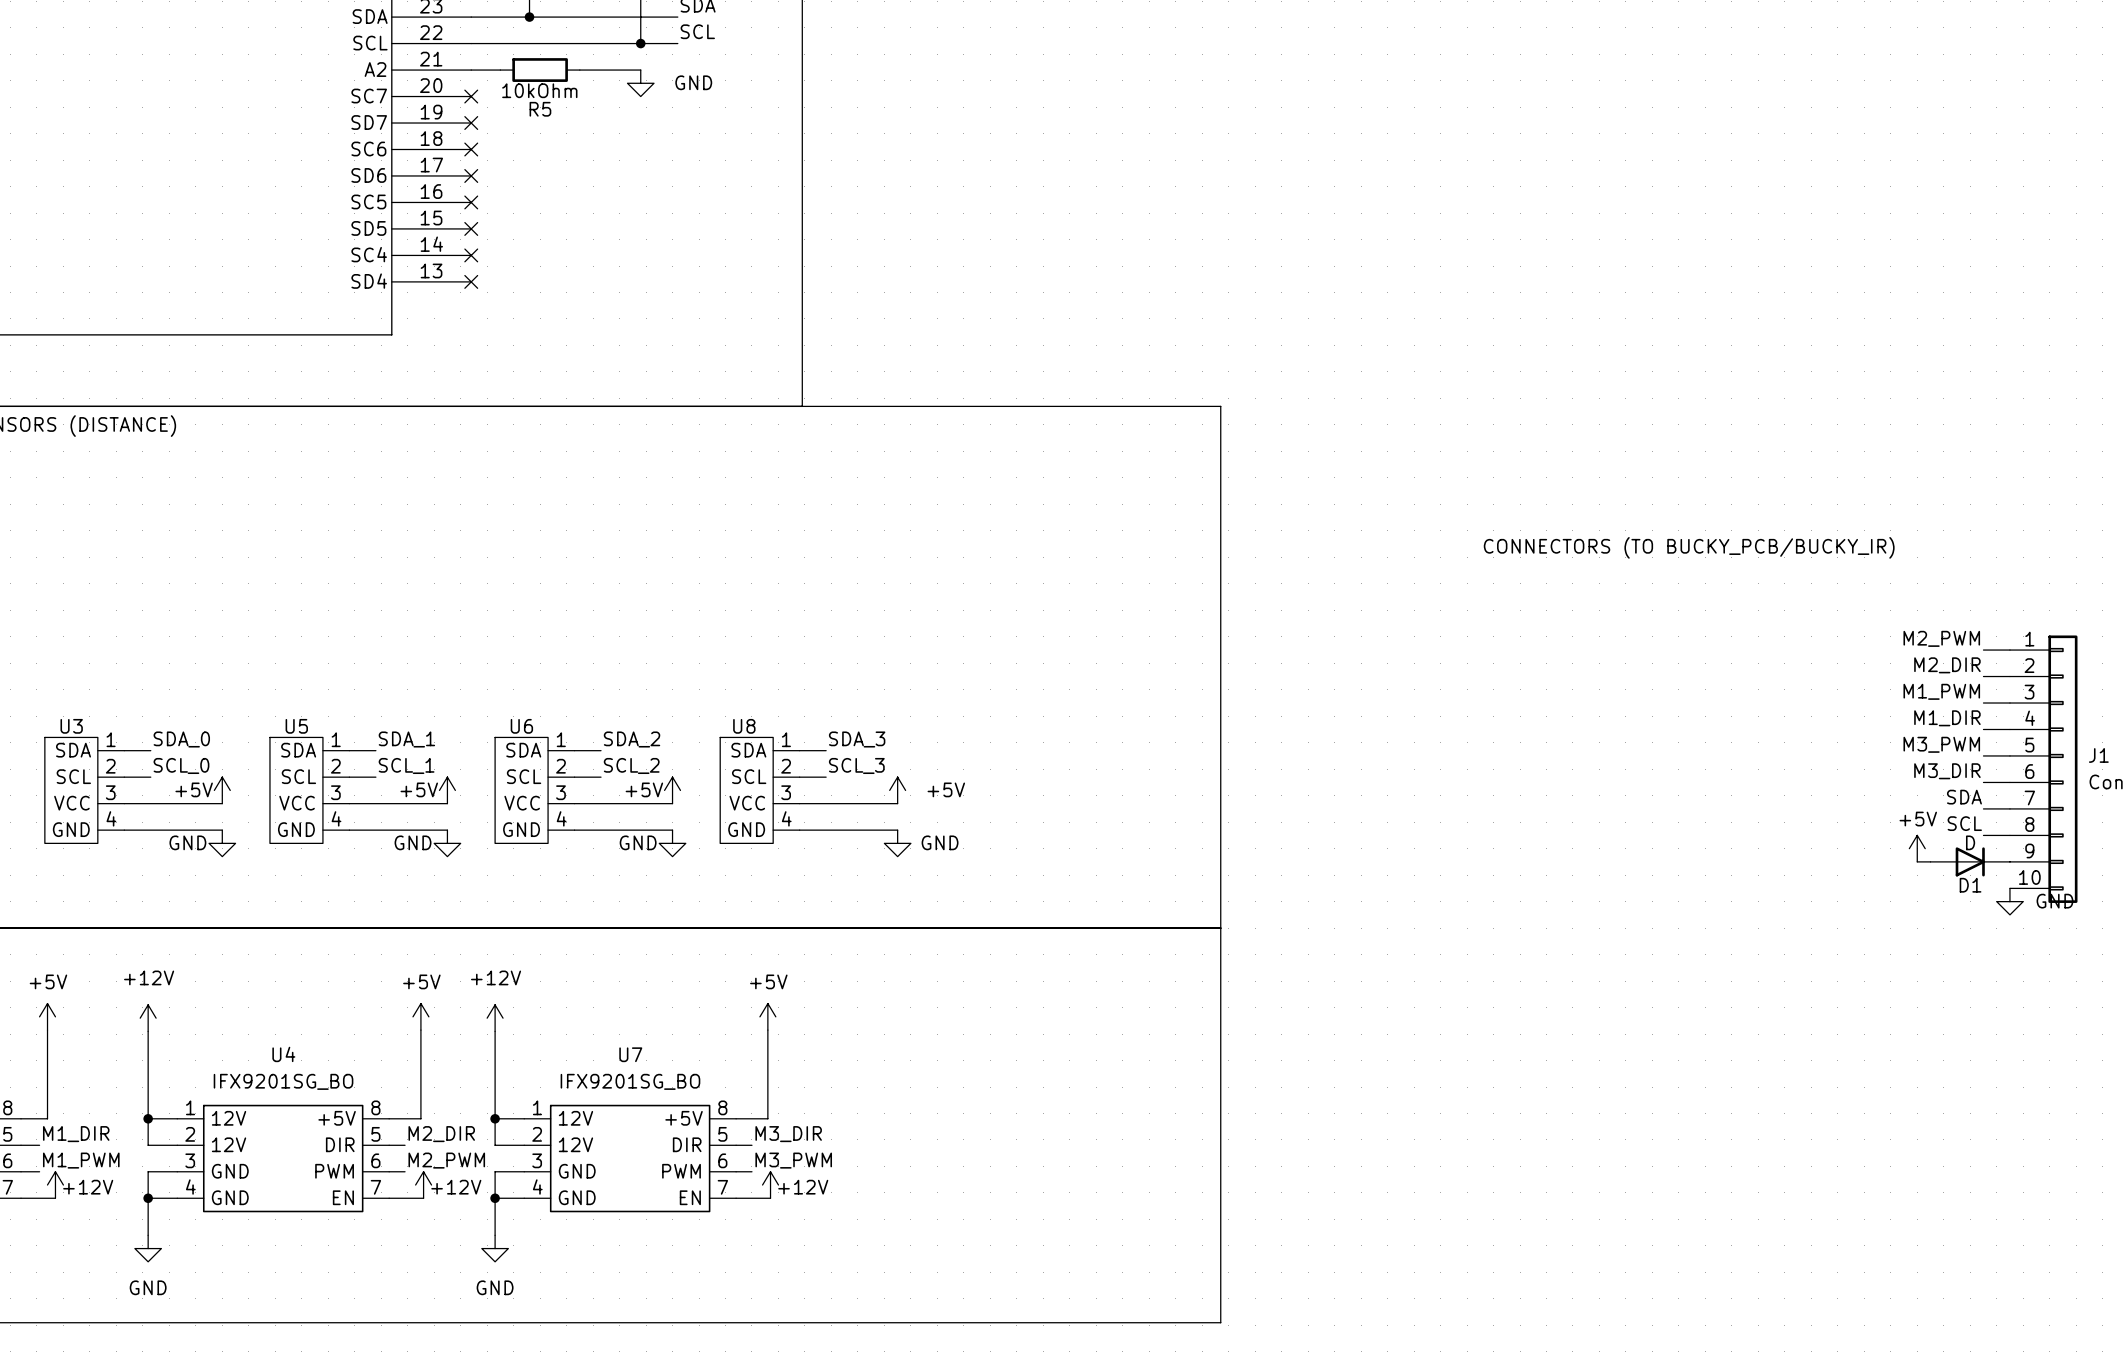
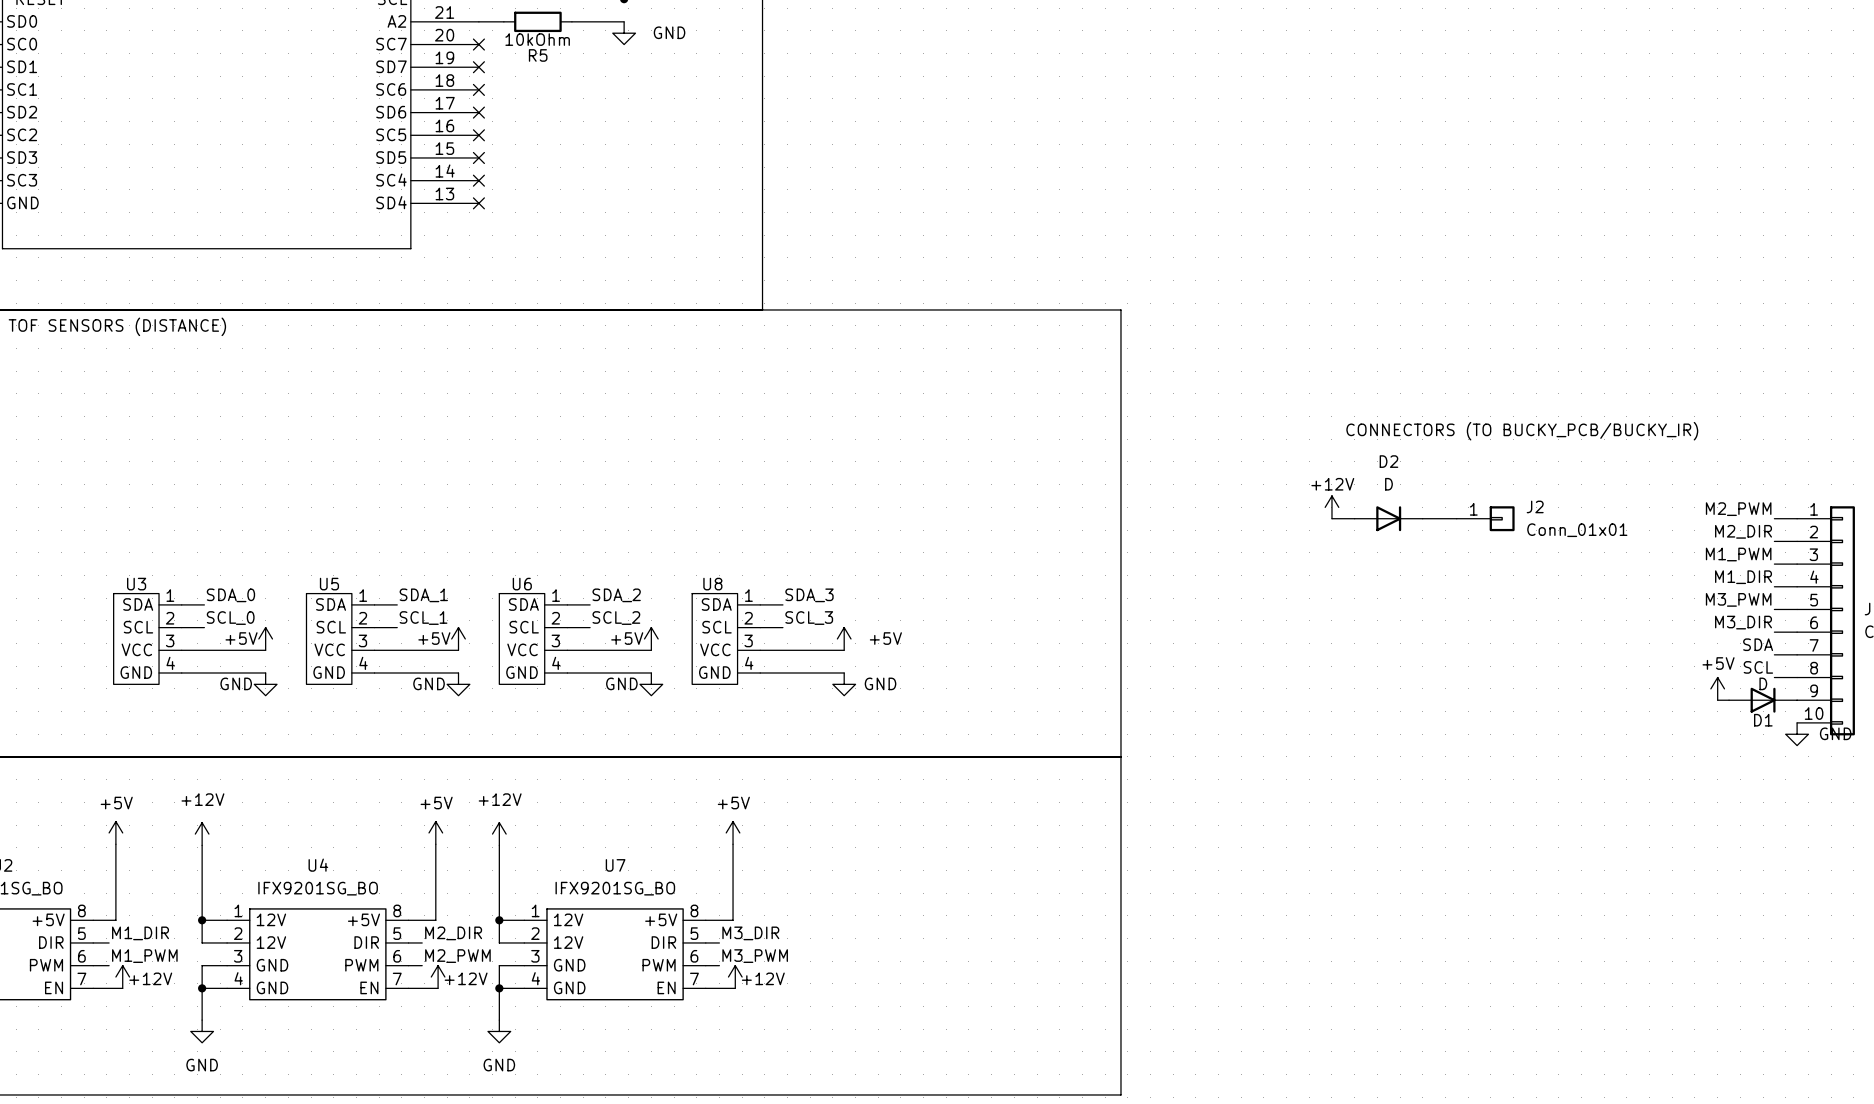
power symbol: none -> +12V (1331, 507)
wire: none -> (1331, 518) (1354, 518)
D2: none -> D (1388, 518)
wire: none -> (1422, 518) (1456, 518)
J2: none -> Conn_01x01 (1485, 518)

